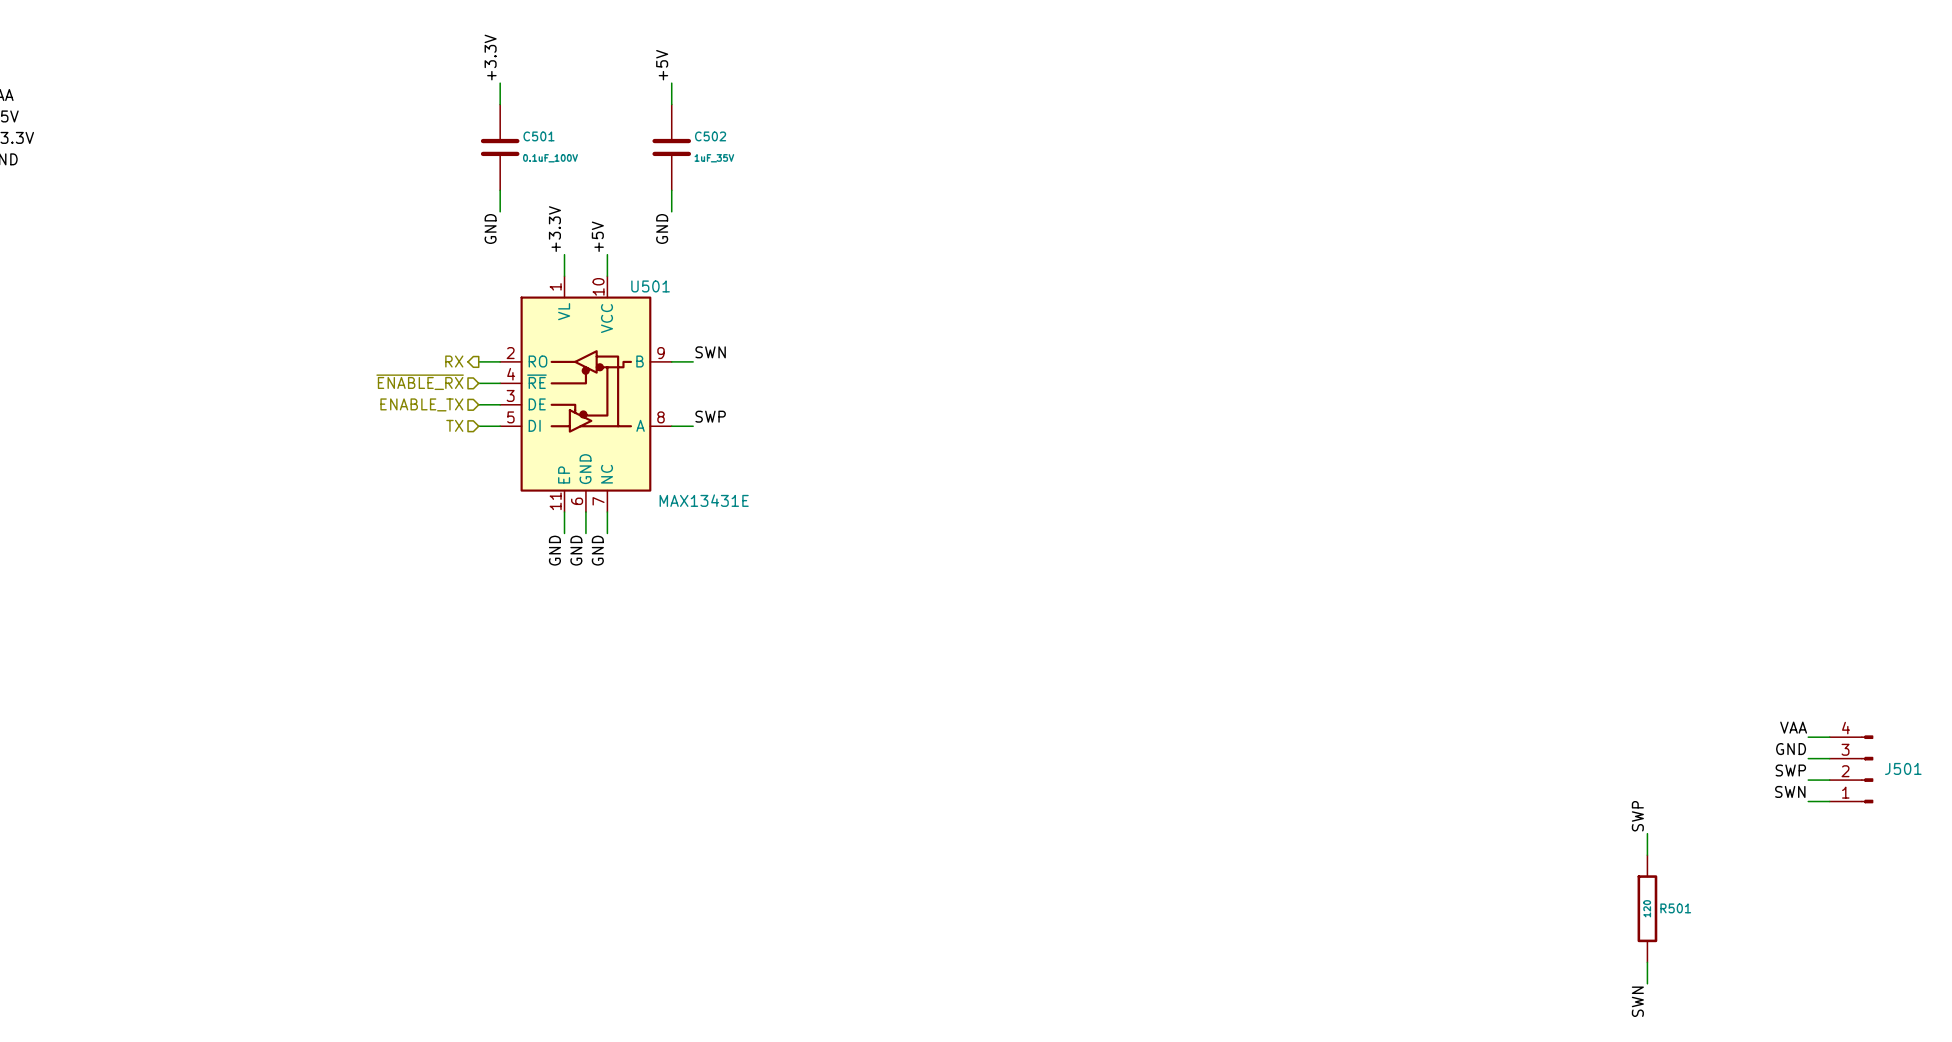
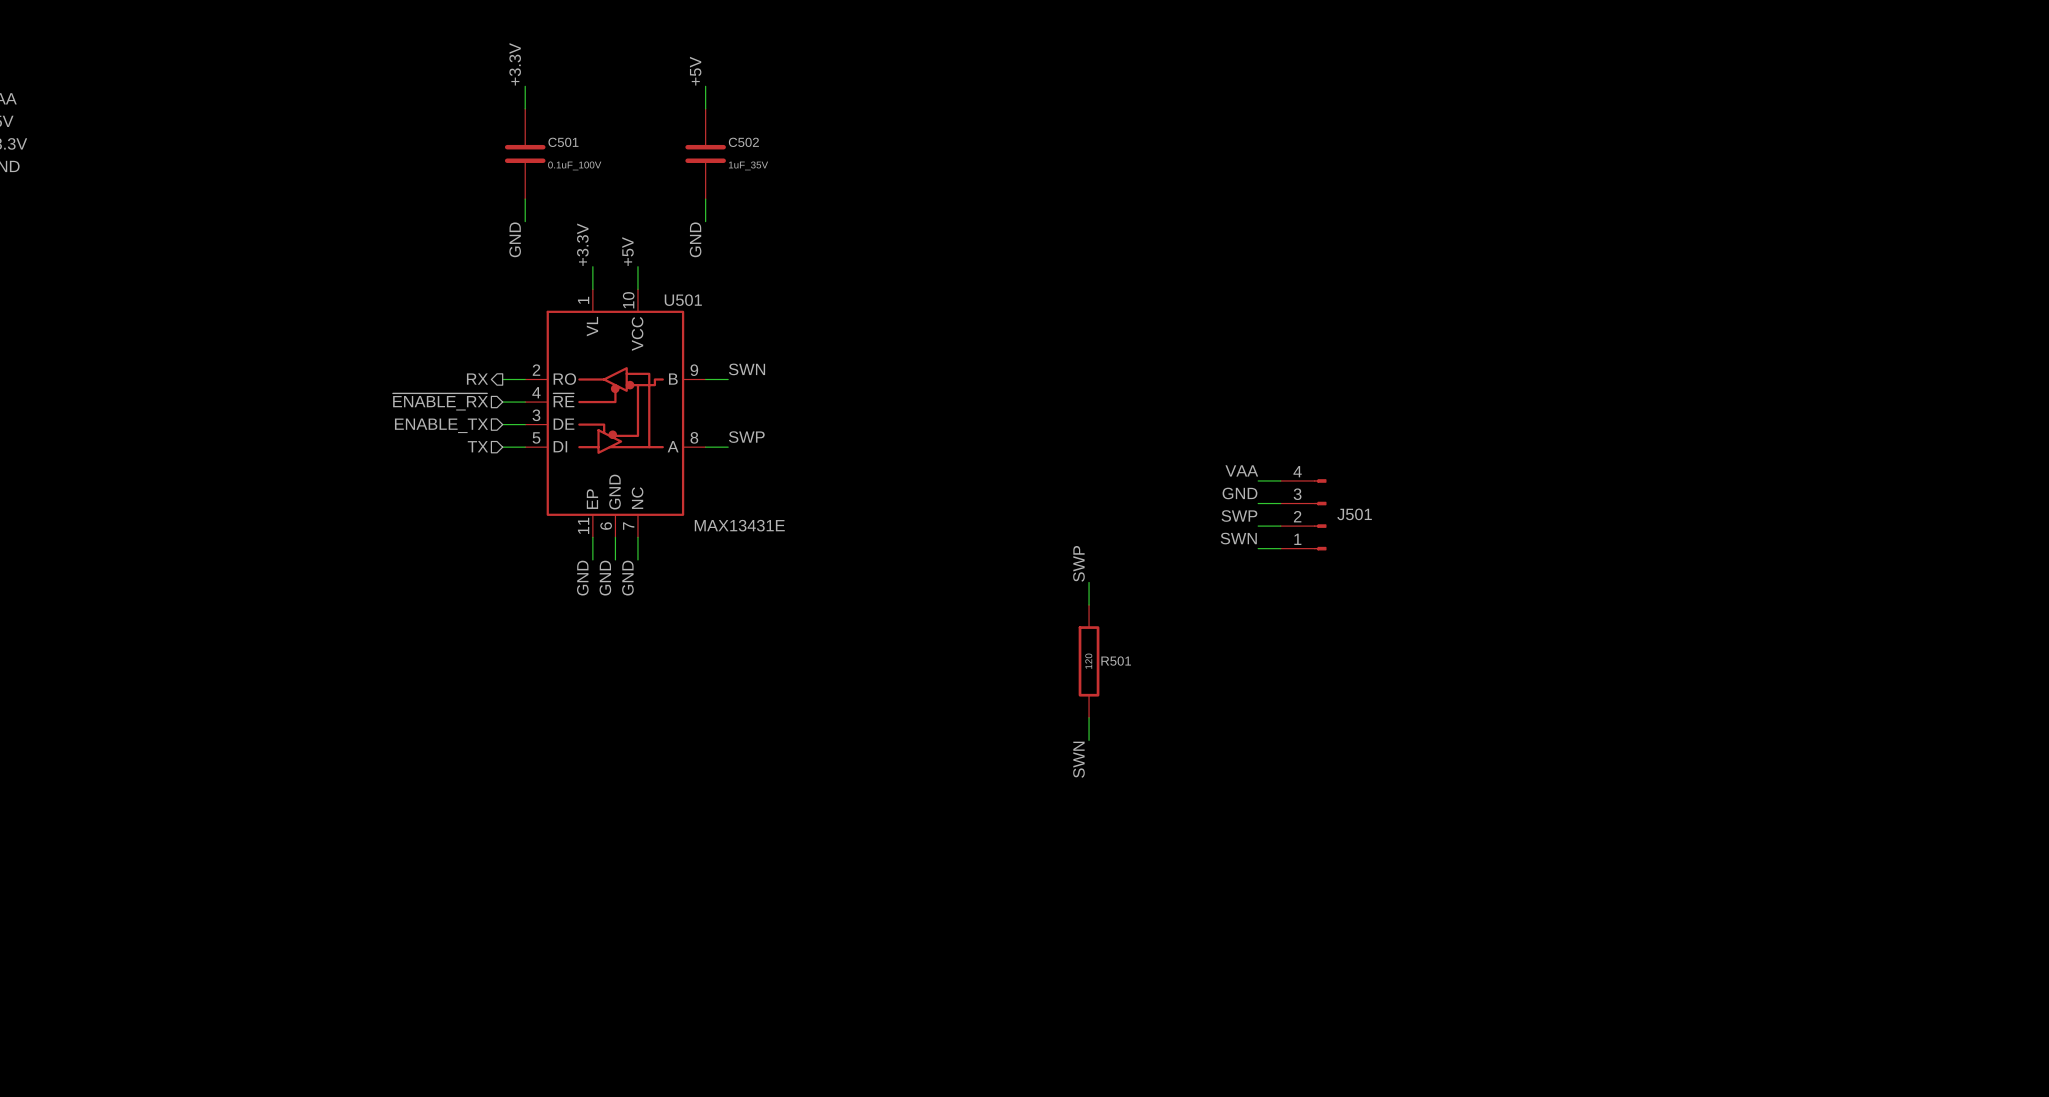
label: none -> VAA (1241, 470)
wire: none -> (1258, 480) (1280, 480)
label: none -> GND (1239, 493)
wire: none -> (1258, 503) (1280, 503)
label: none -> SWP (1239, 516)
wire: none -> (1258, 526) (1280, 526)
label: none -> SWN (1238, 538)
wire: none -> (1258, 548) (1280, 548)
label: none -> SWP (1078, 563)
wire: none -> (1089, 582) (1089, 605)
wire: none -> (1089, 717) (1089, 740)
label: none -> SWN (1078, 759)
label: VAA (1793, 727) -> none
wire: (1808, 737) (1829, 737) -> none
label: GND (1791, 749) -> none
wire: (1808, 758) (1829, 758) -> none
J501 position: (1851, 769) -> (1303, 514)
label: SWP (1790, 770) -> none
wire: (1808, 780) (1829, 780) -> none
label: SWN (1790, 791) -> none
wire: (1808, 801) (1829, 801) -> none
label: SWP (1637, 816) -> none
wire: (1647, 833) (1647, 855) -> none
R501 position: (1647, 908) -> (1089, 661)
wire: (1647, 962) (1647, 983) -> none
label: SWN (1637, 1001) -> none

